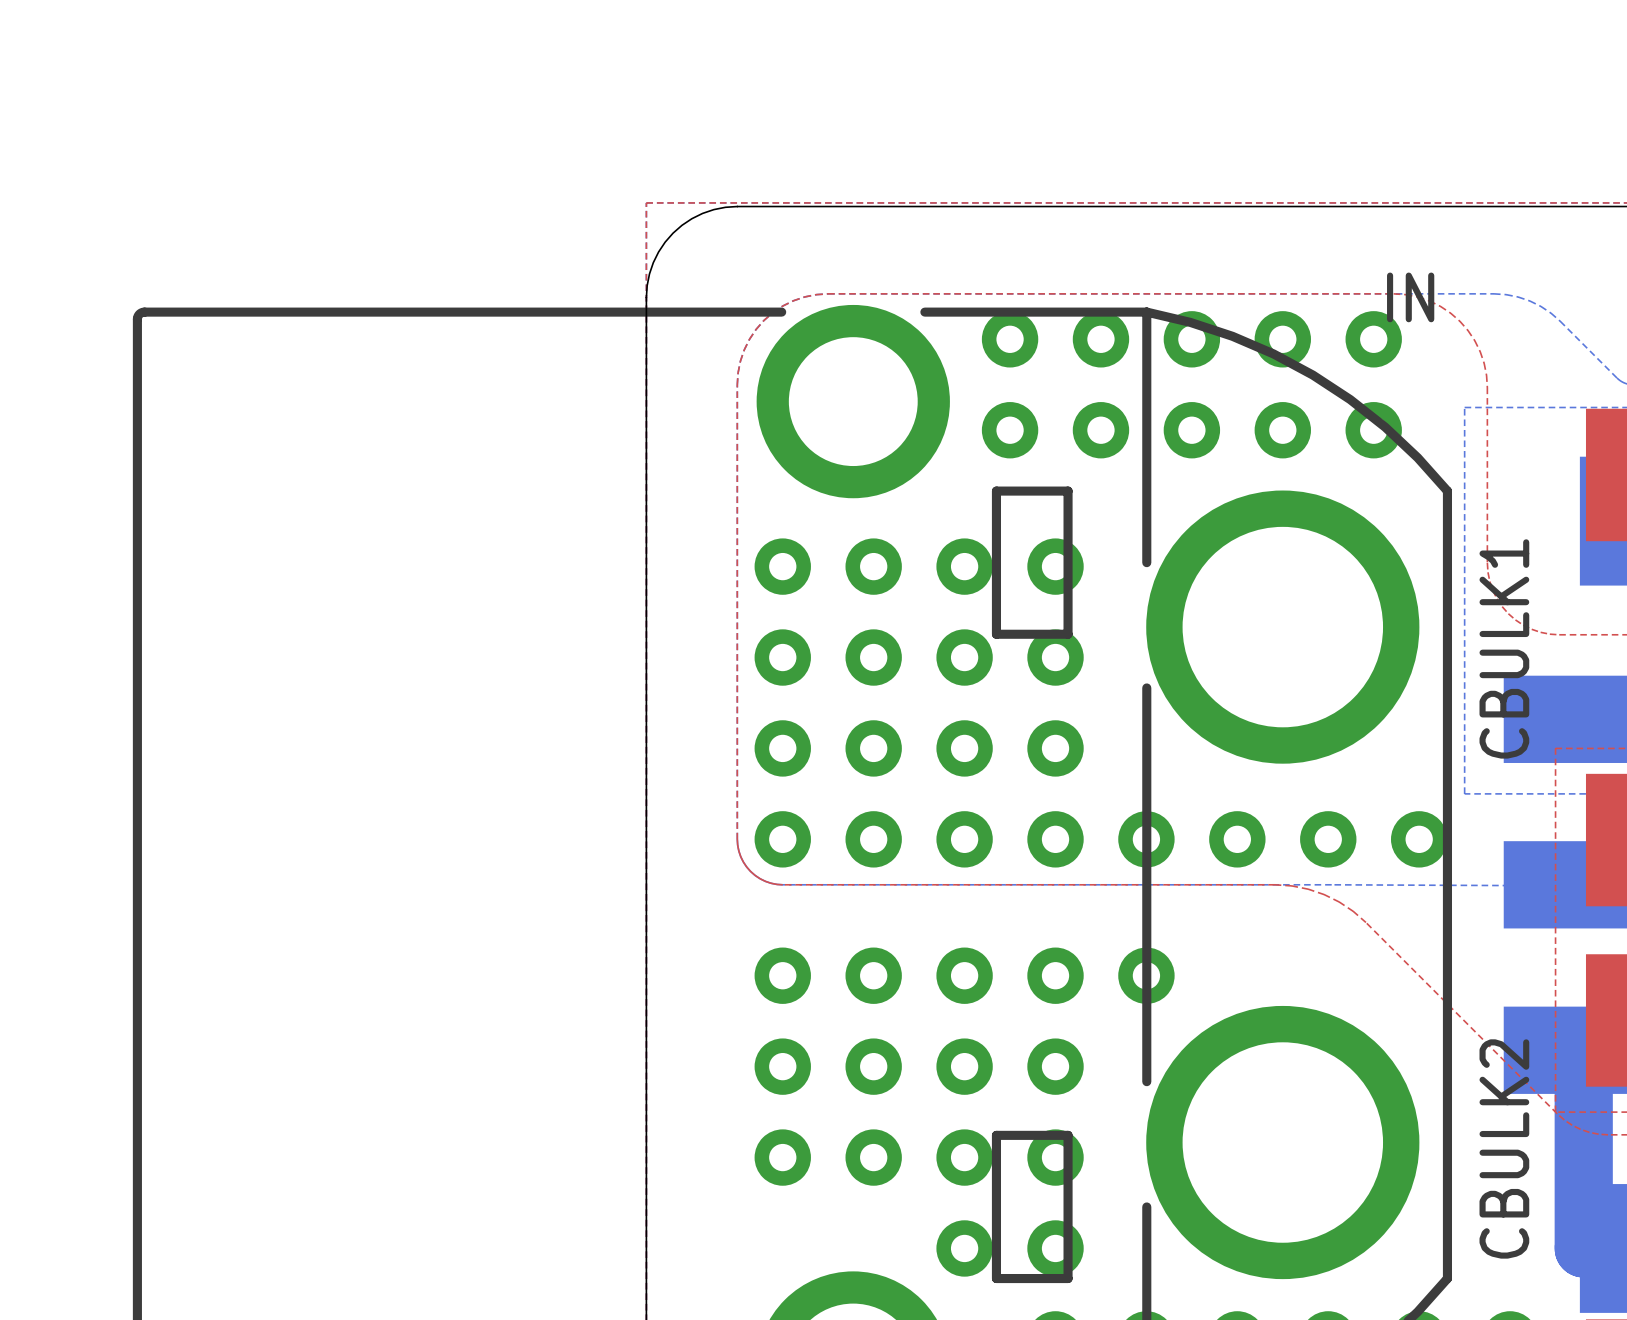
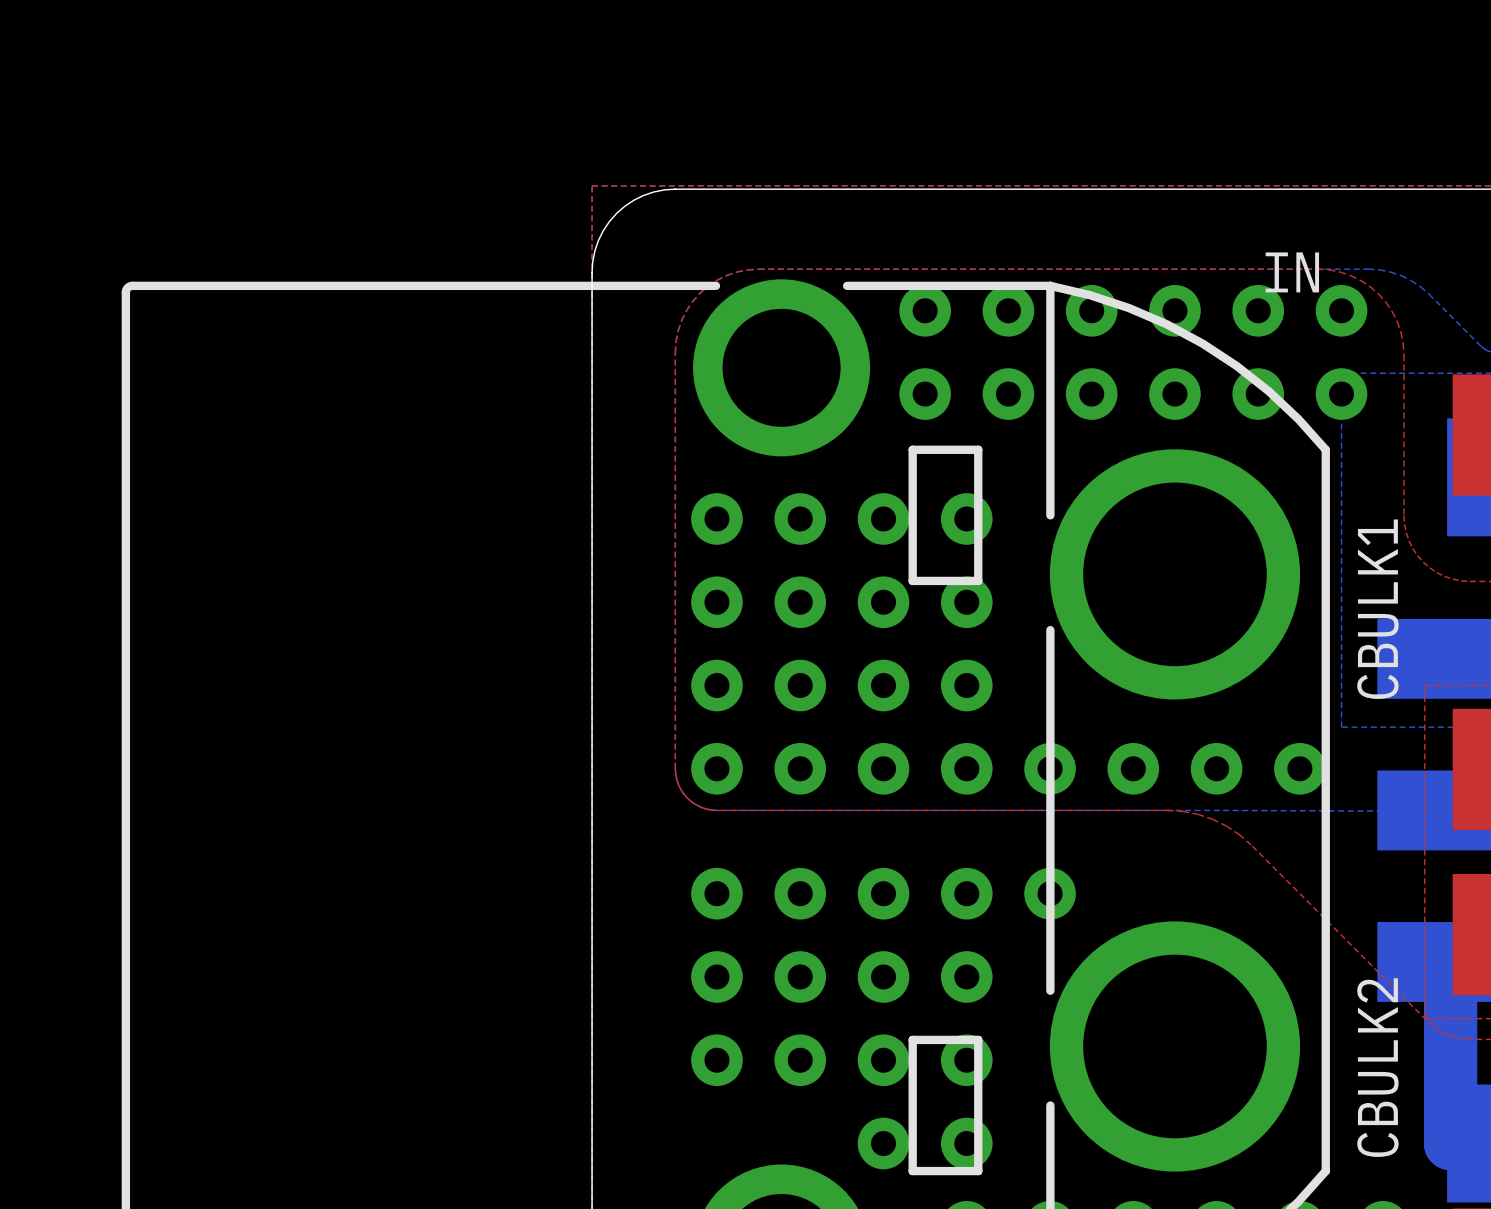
top zone outline: (1393, 293) (1417, 297) (1440, 306) (1450, 313) (1468, 330) (1480, 351) (1484, 363) (1487, 387) (1487, 562) (1489, 581) (1496, 598) (1515, 619) (1540, 632) (1559, 634) (1604, 634) -> (1276, 269) (1329, 269) (1350, 275) (1378, 294) (1392, 312) (1401, 332) (1403, 354) (1403, 515) (1406, 532) (1417, 555) (1429, 567) (1452, 579) (1469, 581)
via: none -> (1341, 310)
via: none -> (1341, 394)

